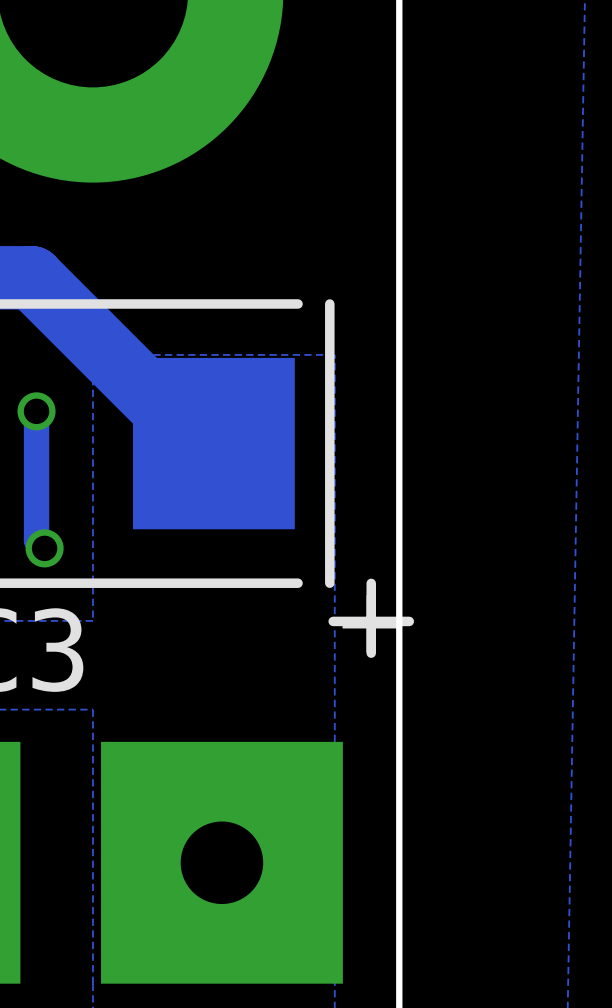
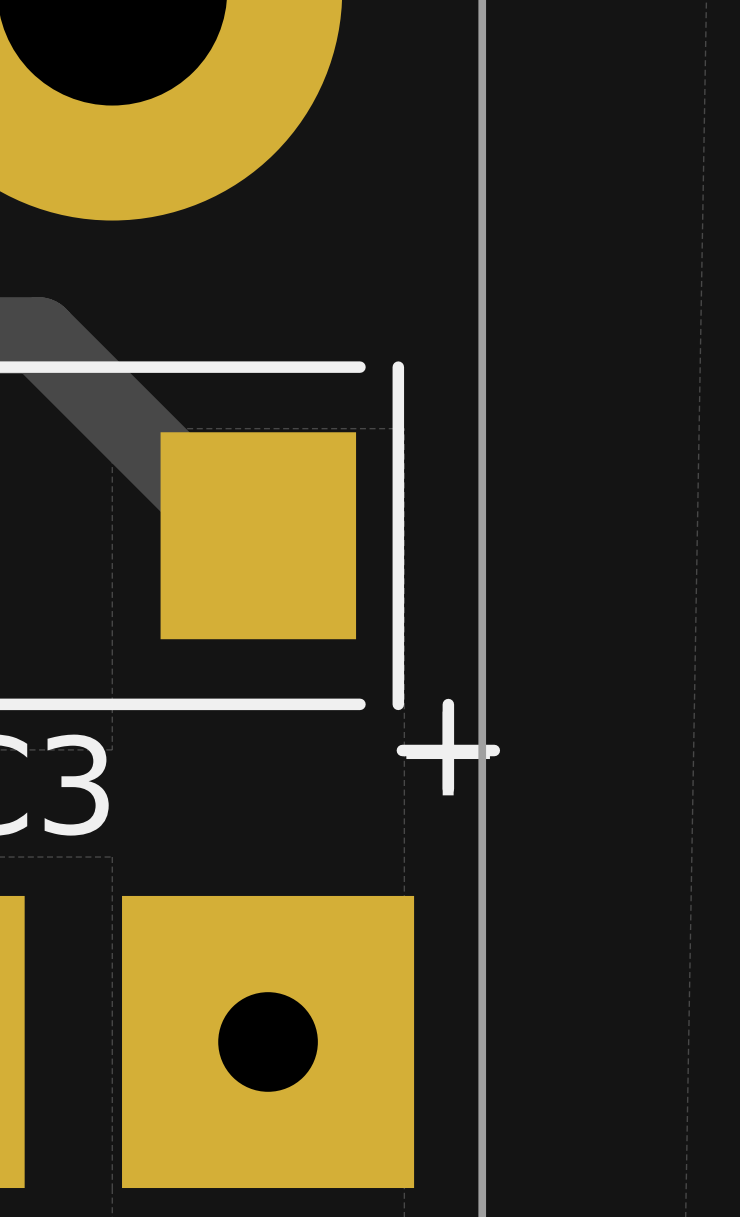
track: (36, 411) (36, 540) (44, 548) -> none
via: (36, 411) -> none
via: (44, 548) -> none

